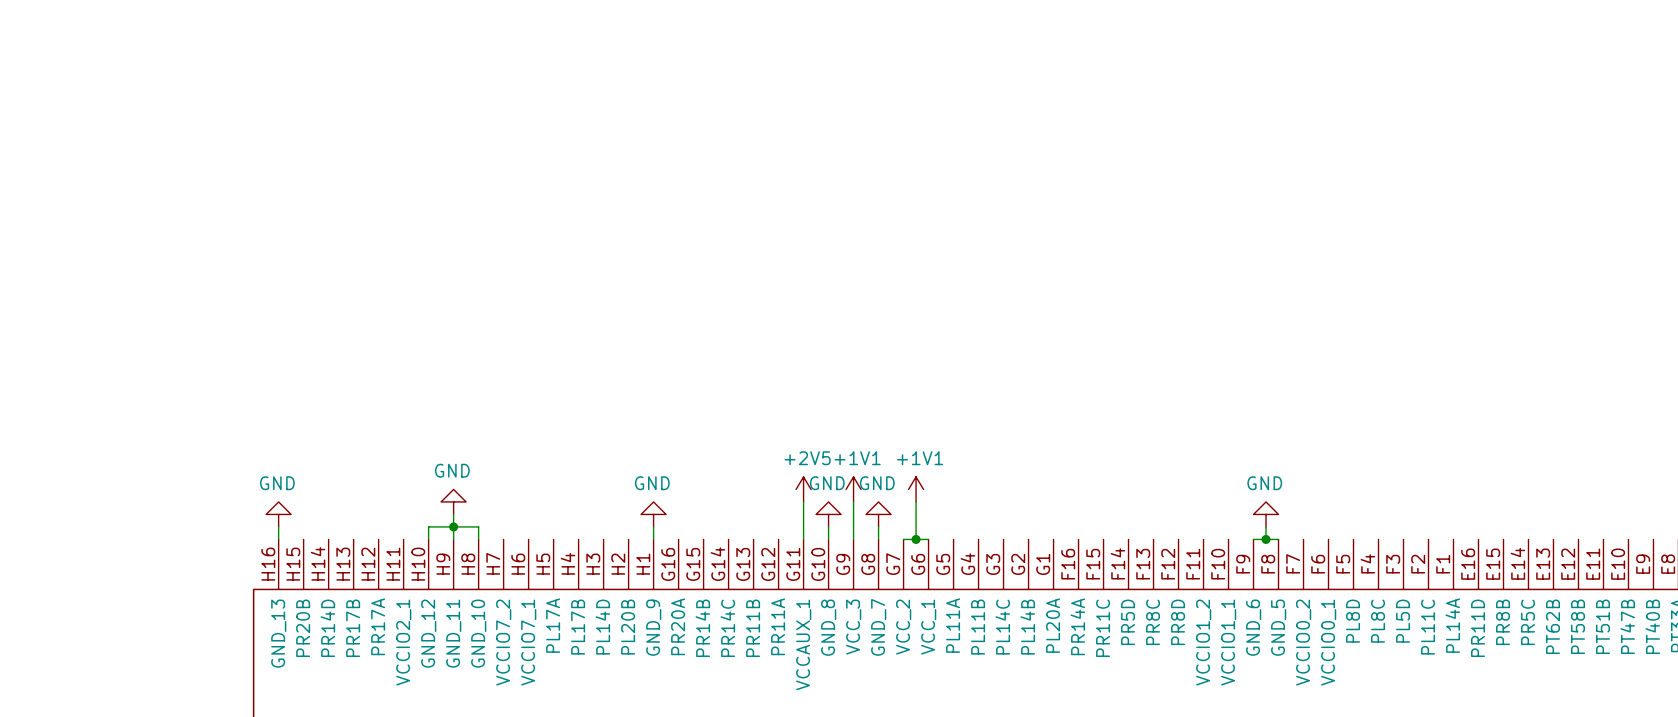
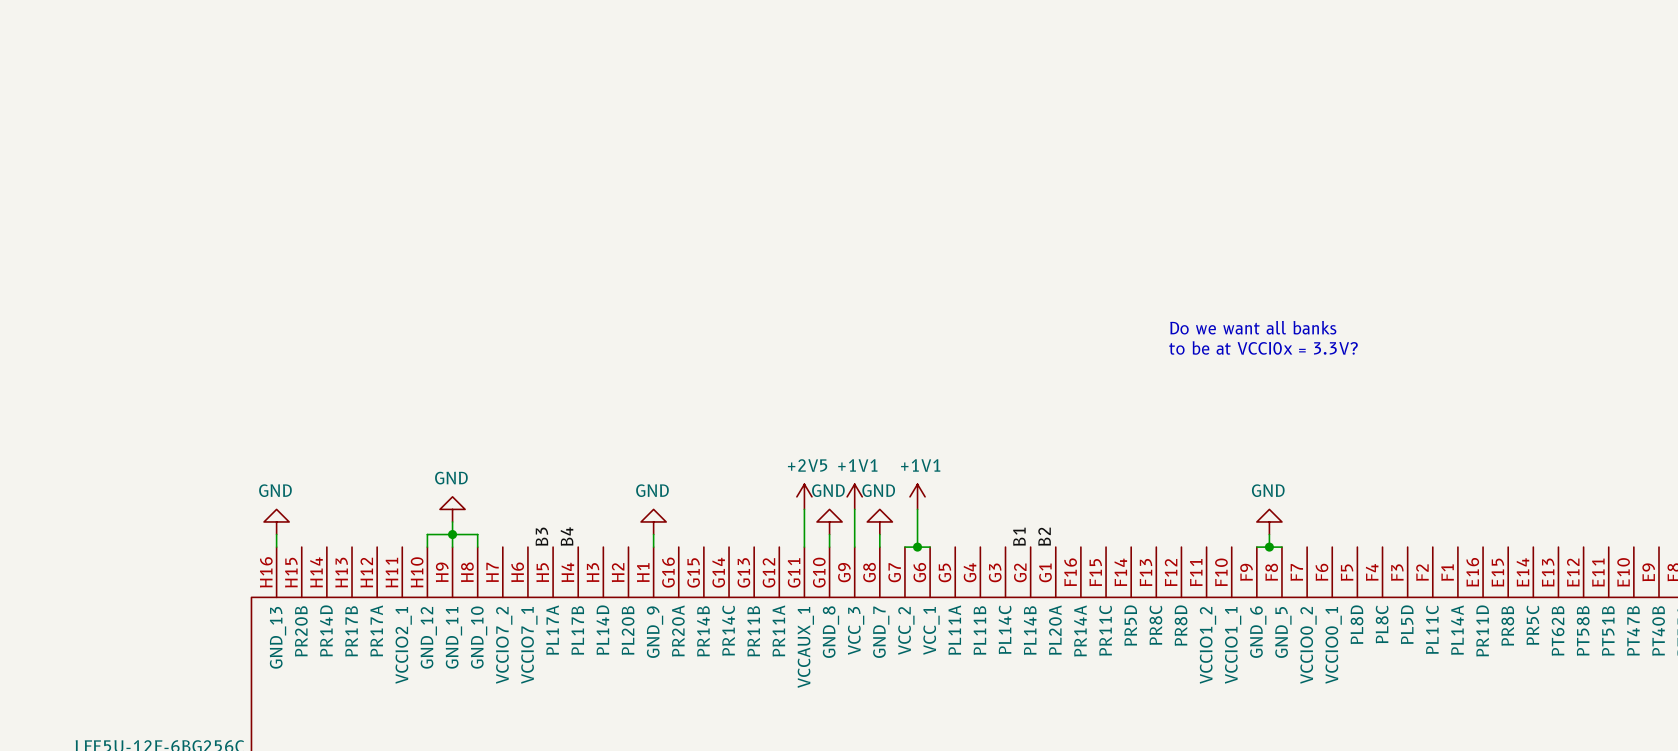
text: none -> Do we want all banks (1253, 327)
text: none -> to be at VCCI0x = 3.3V? (1263, 347)
label: none -> B3 (541, 536)
label: none -> B4 (567, 536)
label: none -> B1 (1019, 536)
label: none -> B2 (1044, 536)

